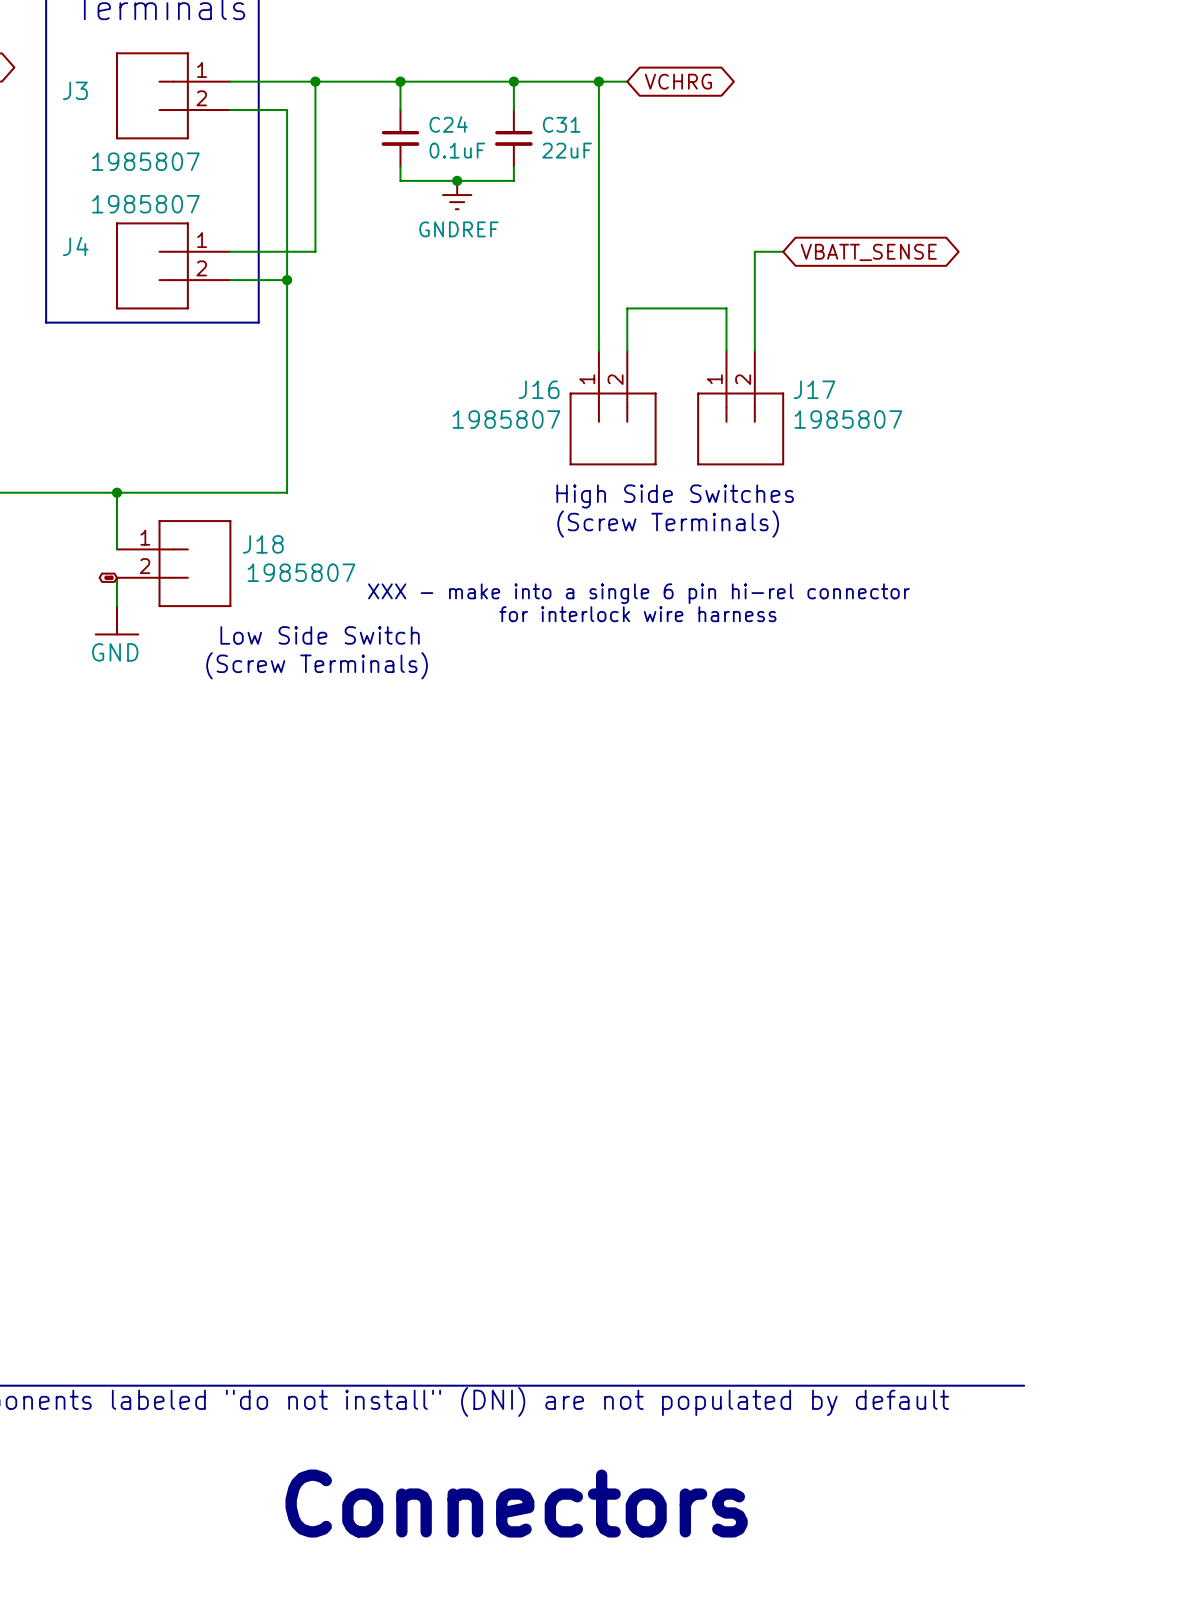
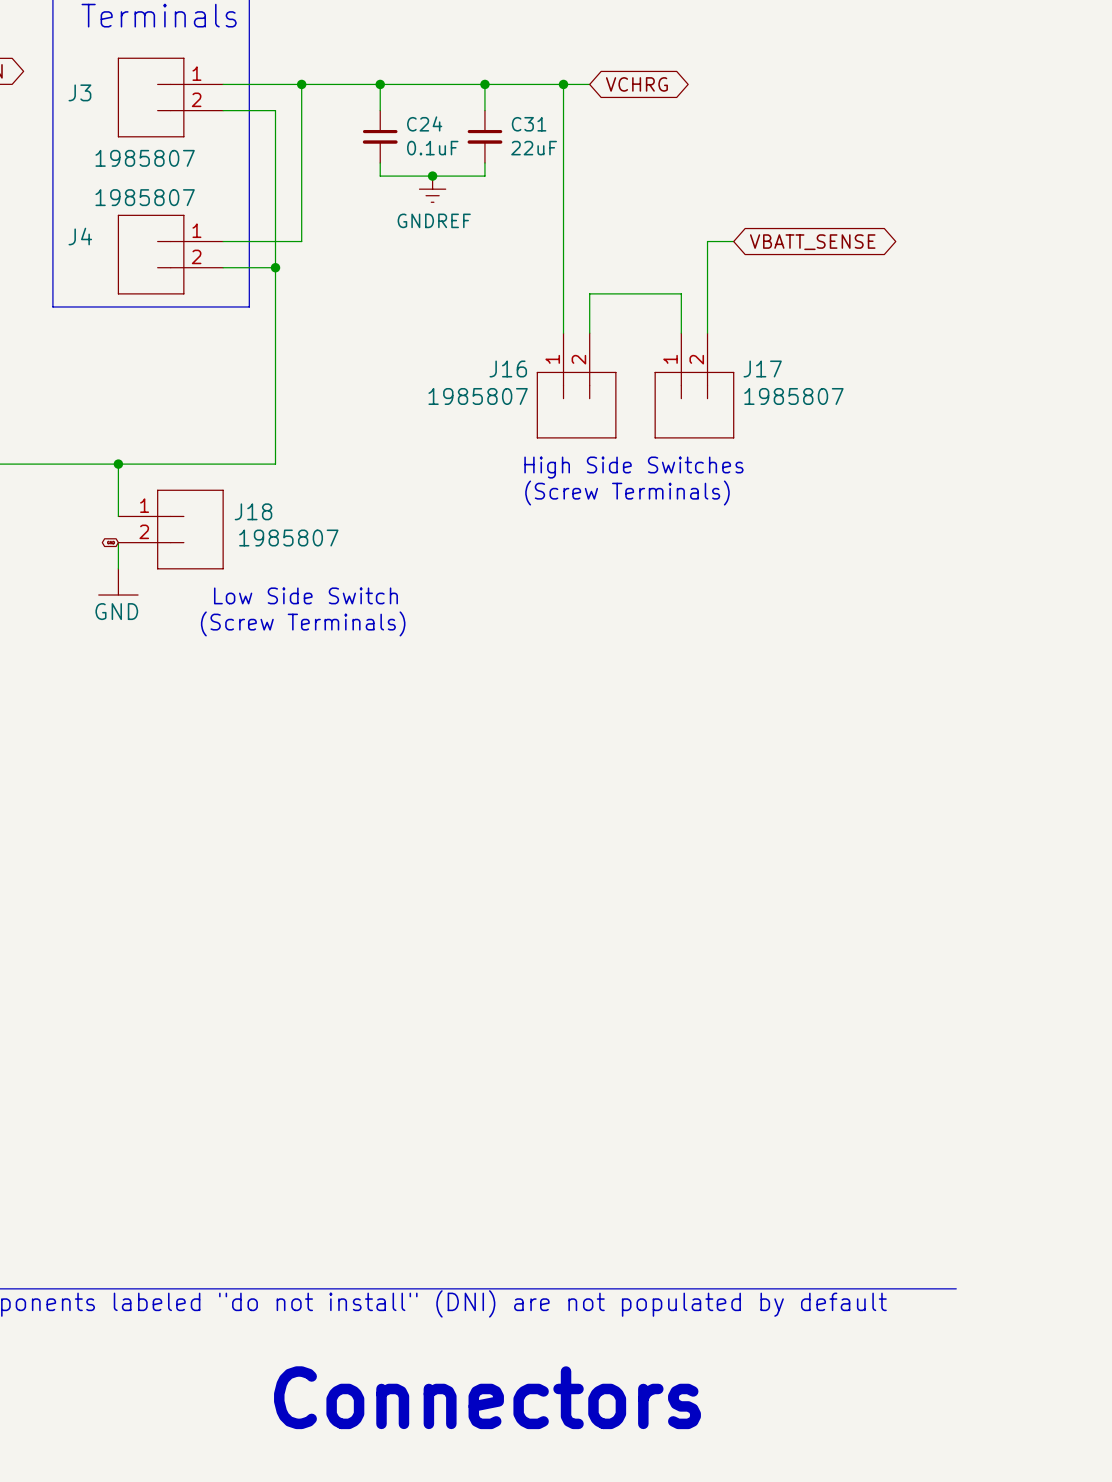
text: XXX - make into a single 6 pin hi-rel connector (638, 593) -> none
text: for interlock wire harness (637, 614) -> none

